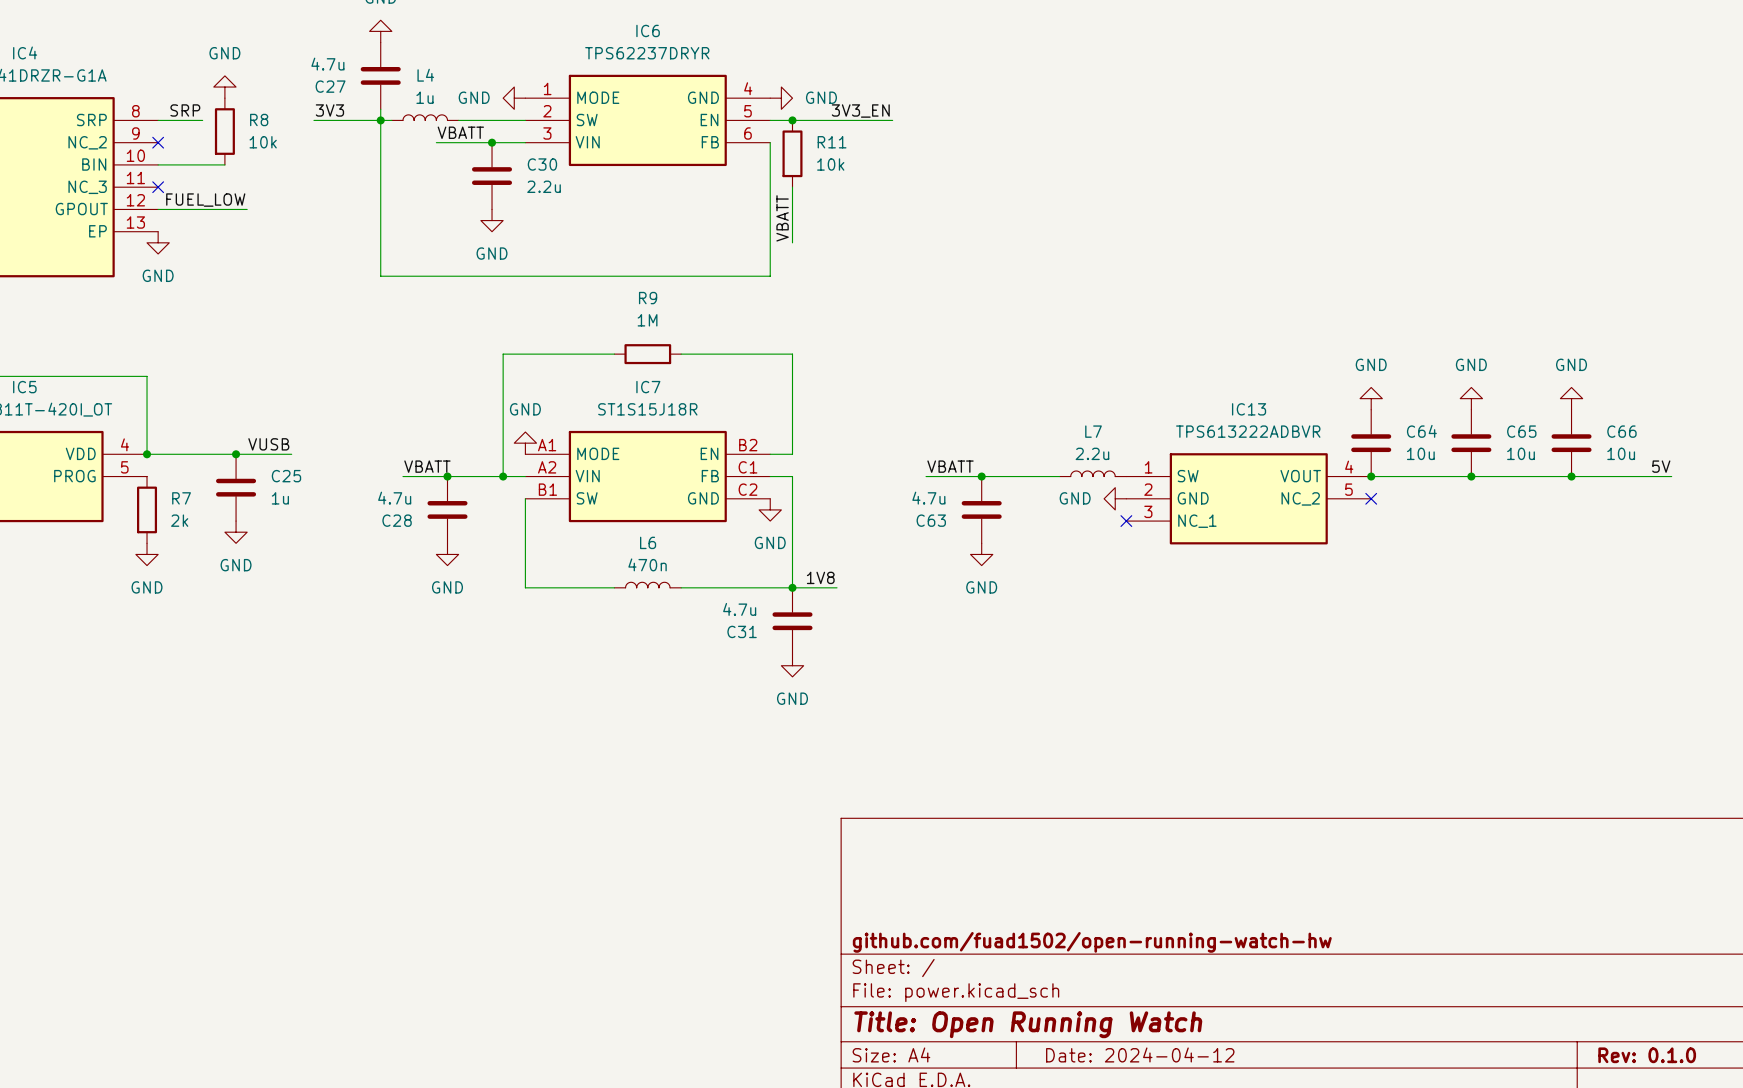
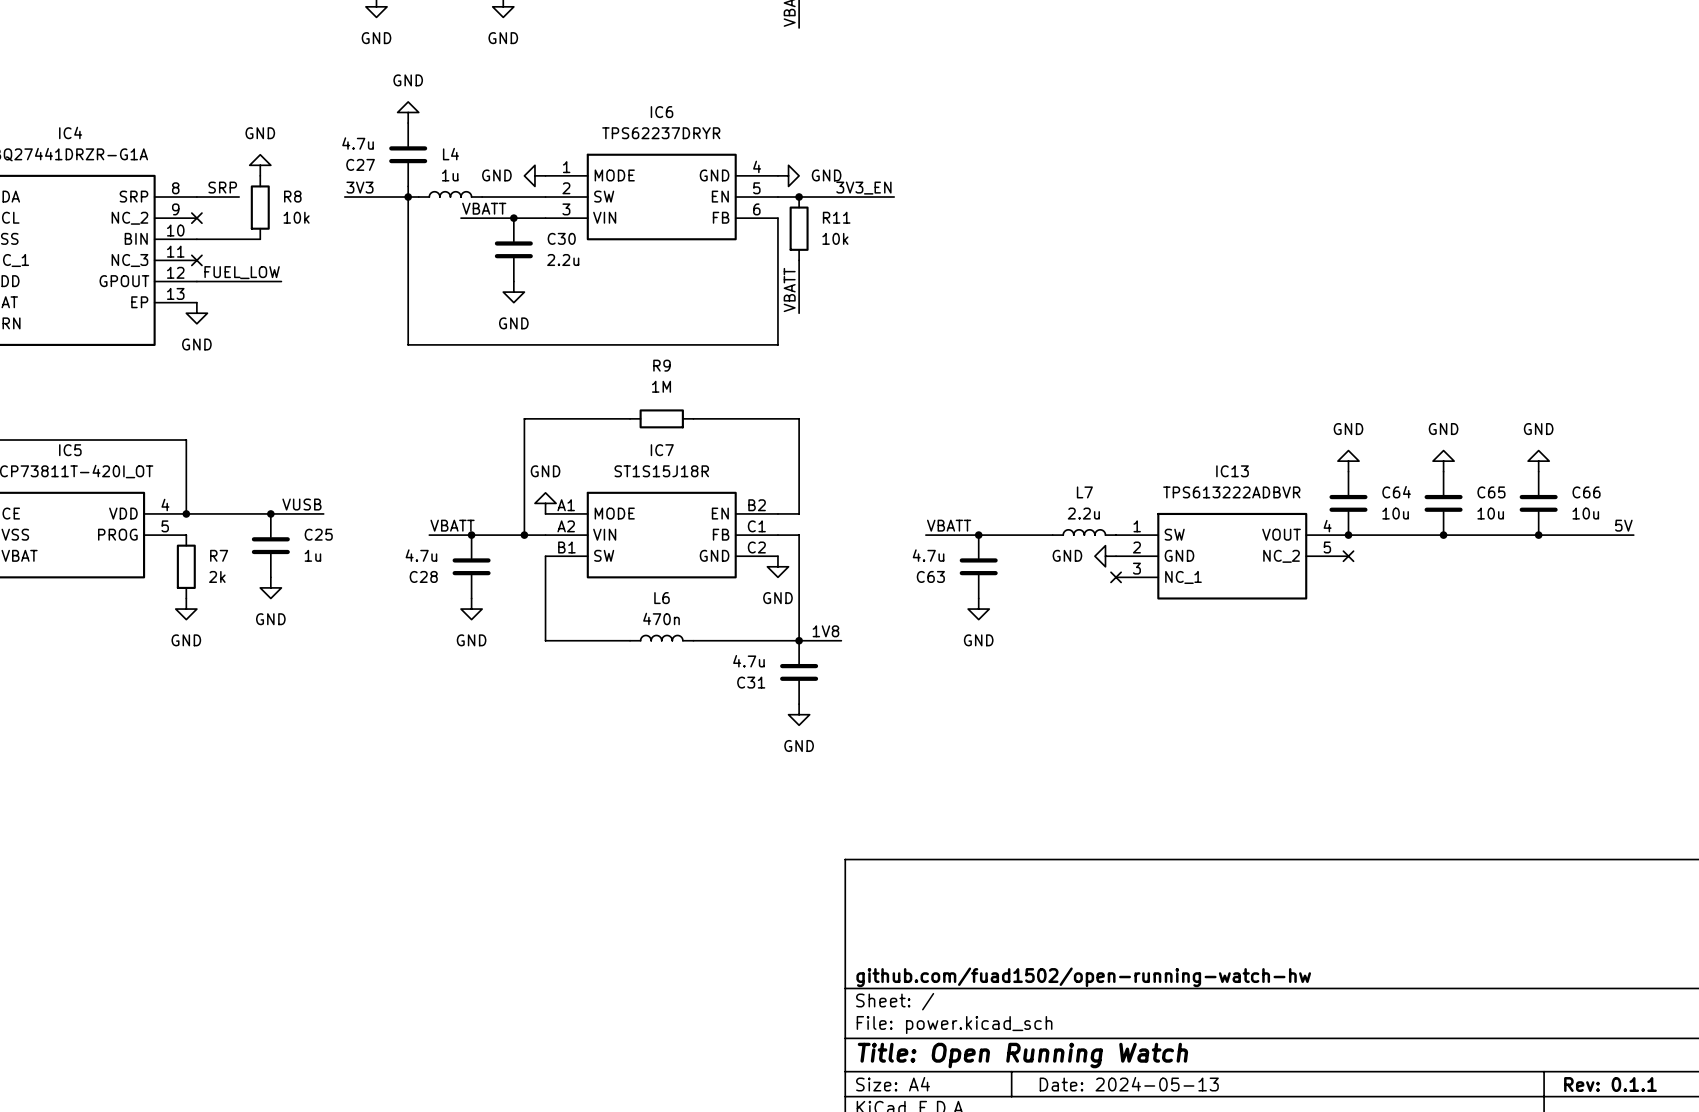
title block: Date: 2024-04-12 (1140, 1054) -> Date: 2024-05-13 (1129, 1084)
title block: Rev: 0.1.0 (1647, 1055) -> Rev: 0.1.1 (1610, 1084)

